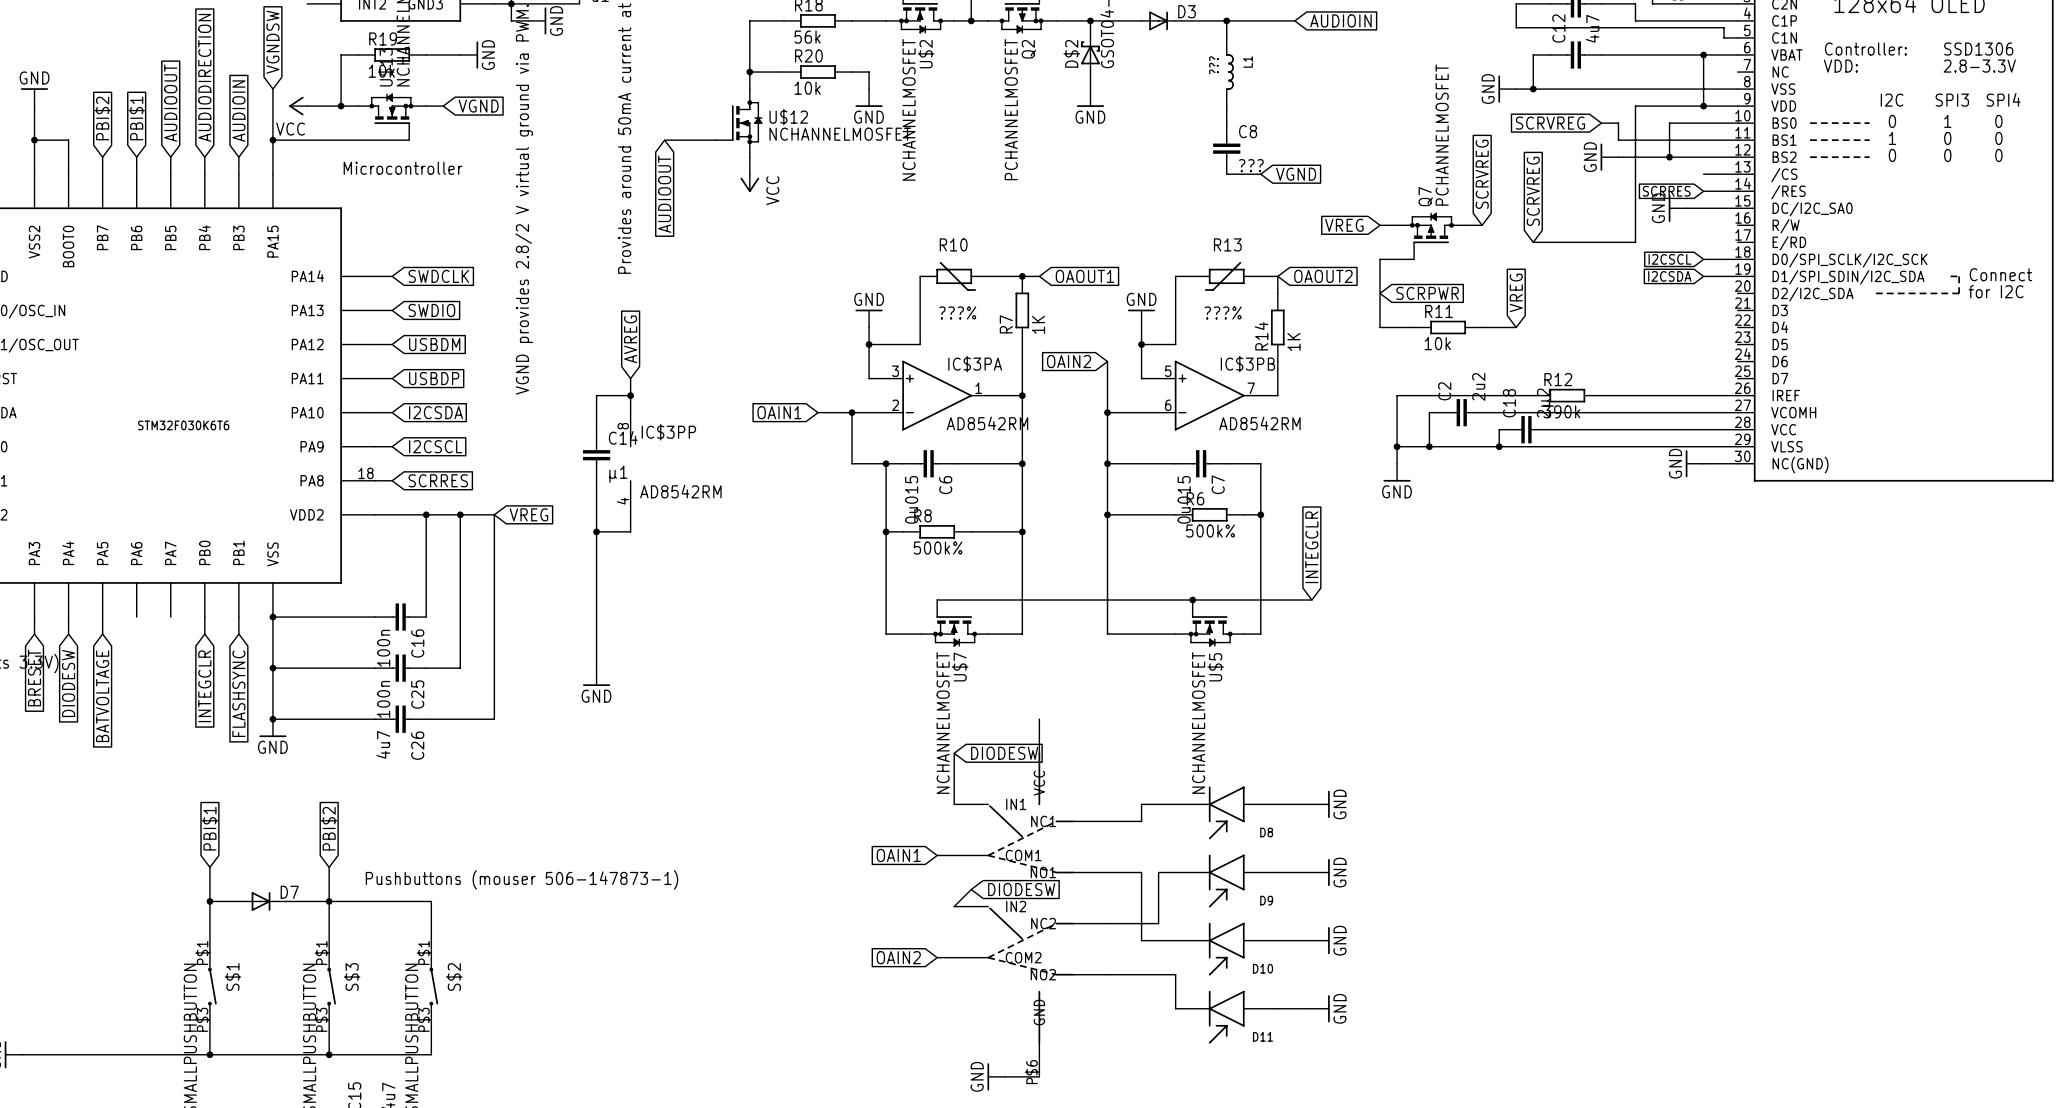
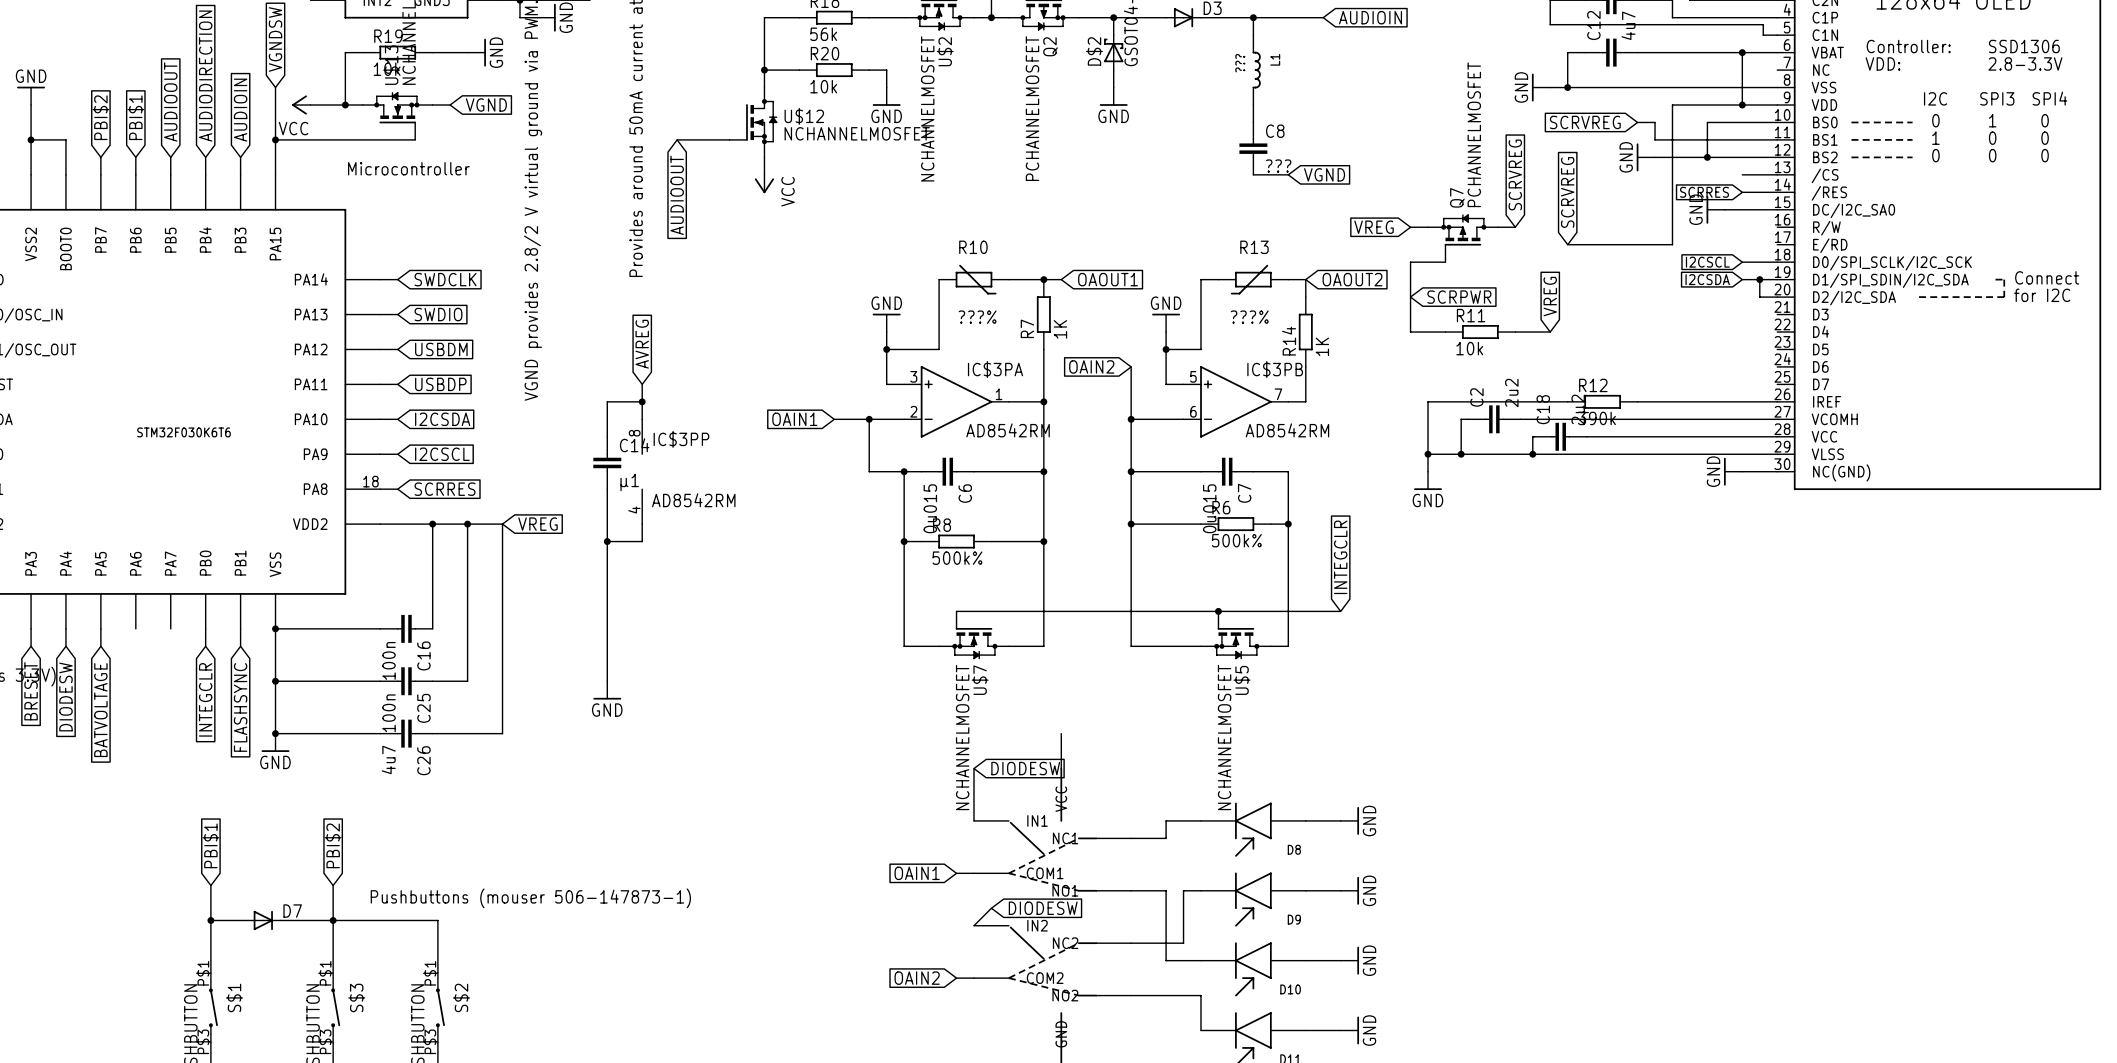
wire: none -> (1759, 279) (1759, 297) (1777, 297)
junction: none -> (1759, 279)

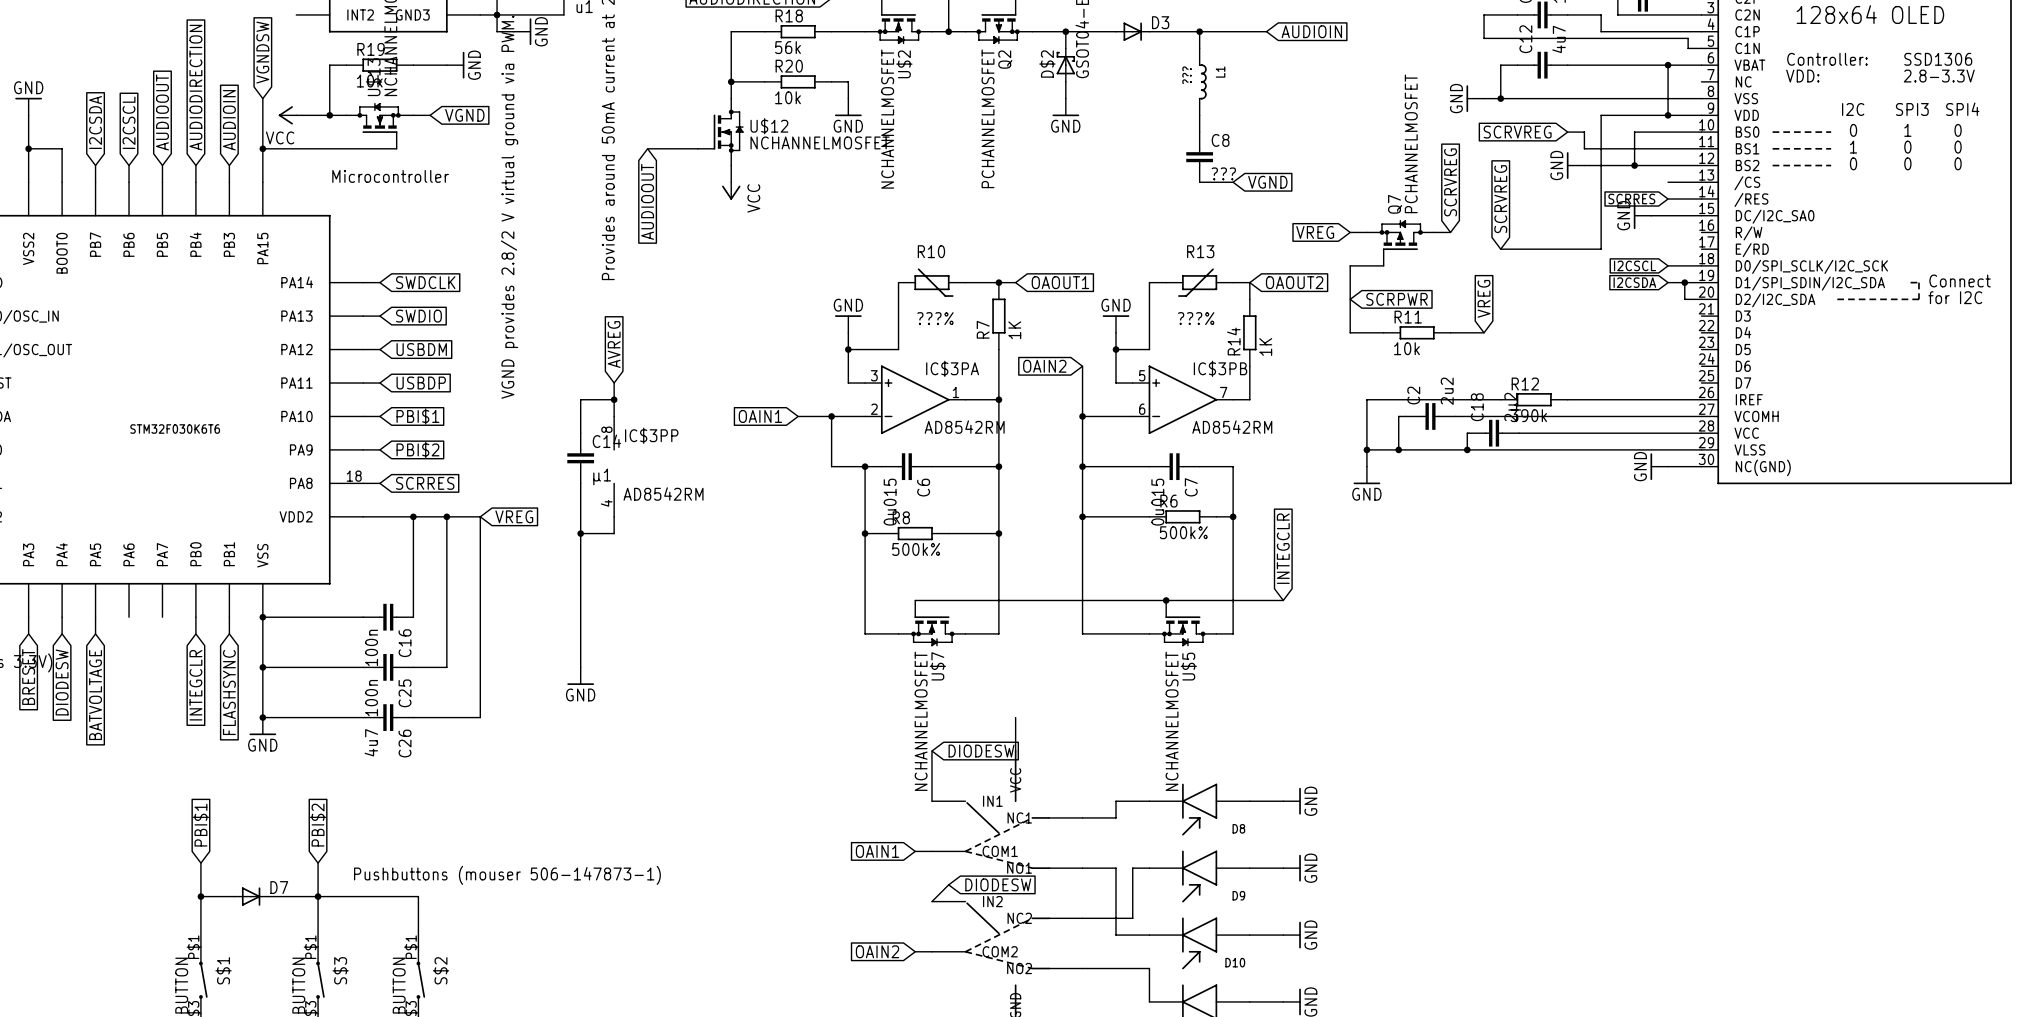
global label: PBI$2 (100, 117) -> I2CSDA (95, 122)
global label: PBI$1 (135, 117) -> I2CSCL (129, 122)
global label: I2CSDA (442, 419) -> PBI$1 (417, 416)
global label: I2CSCL (442, 454) -> PBI$2 (417, 449)

